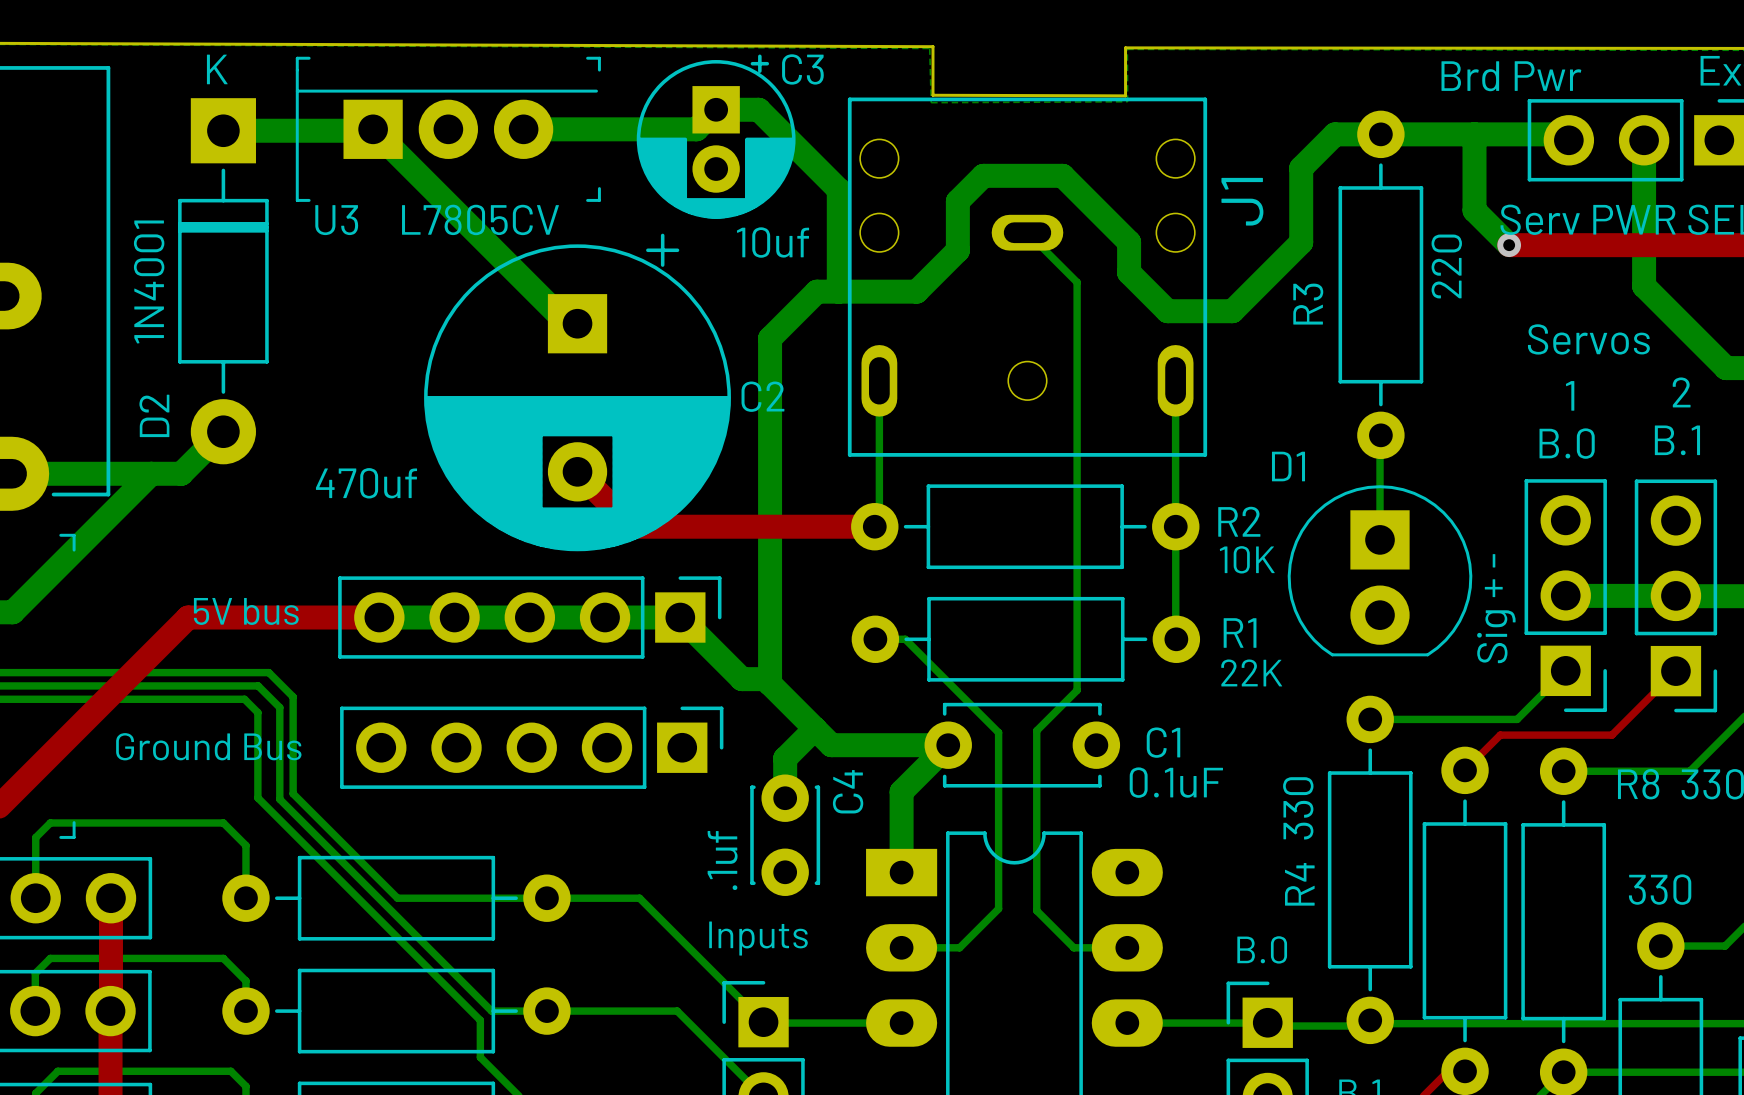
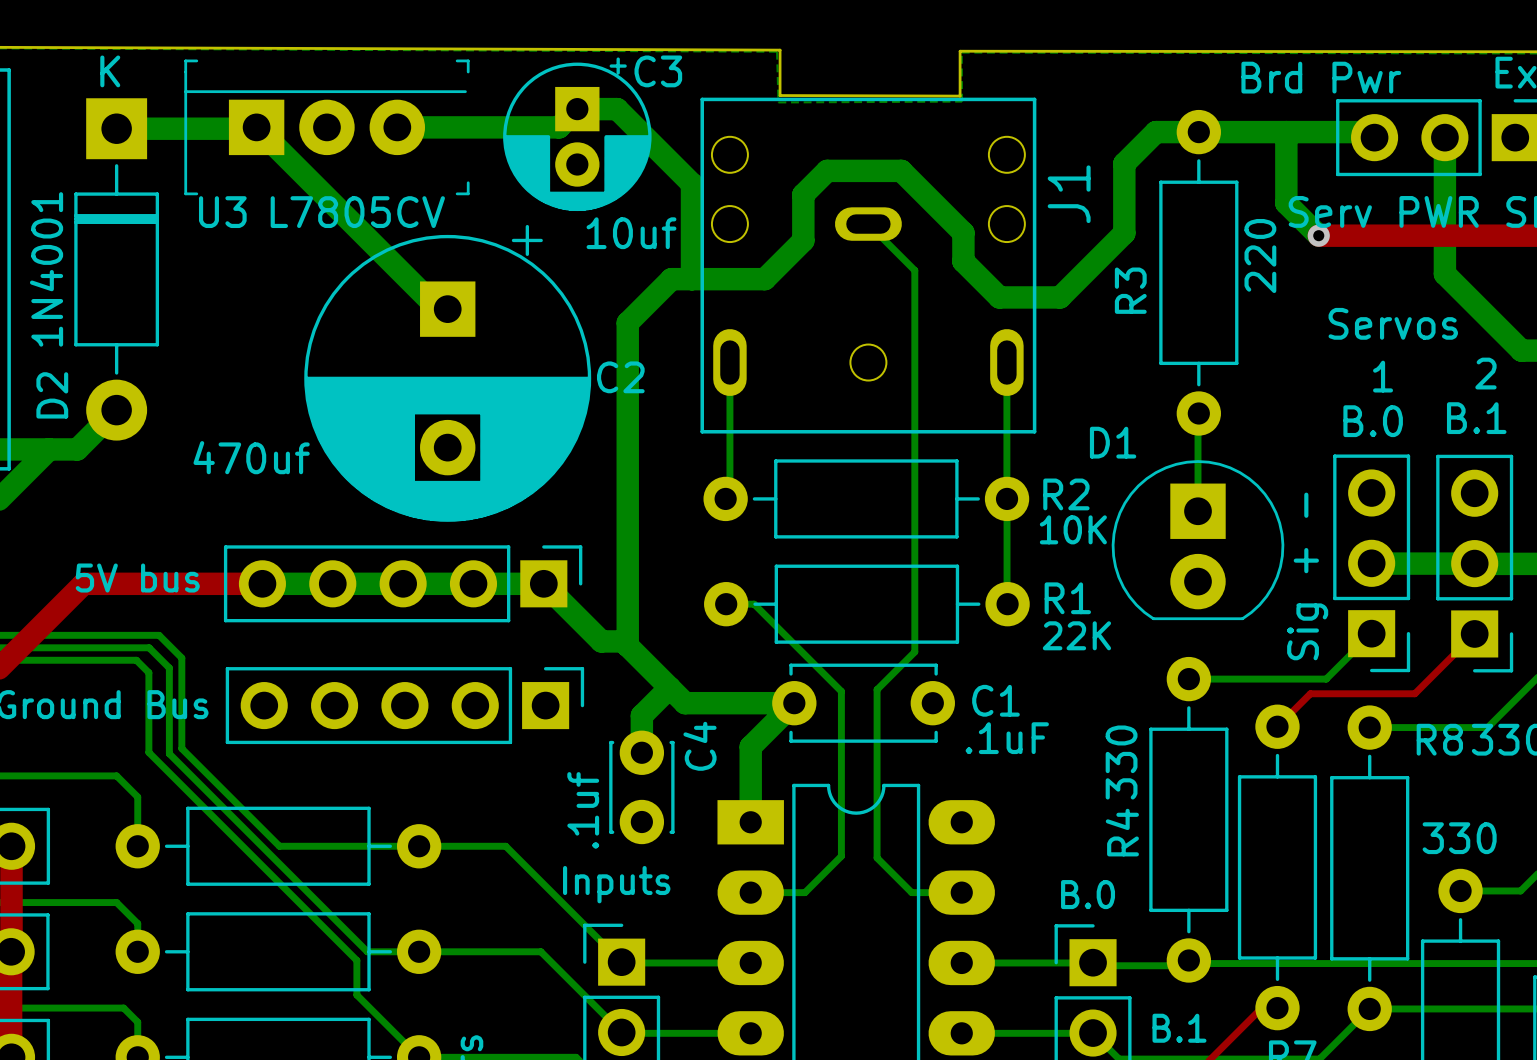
top track: (577, 471) (632, 526) (874, 526) -> none
C1 value: 0.1uF (1176, 782) -> .1uF (1007, 738)

